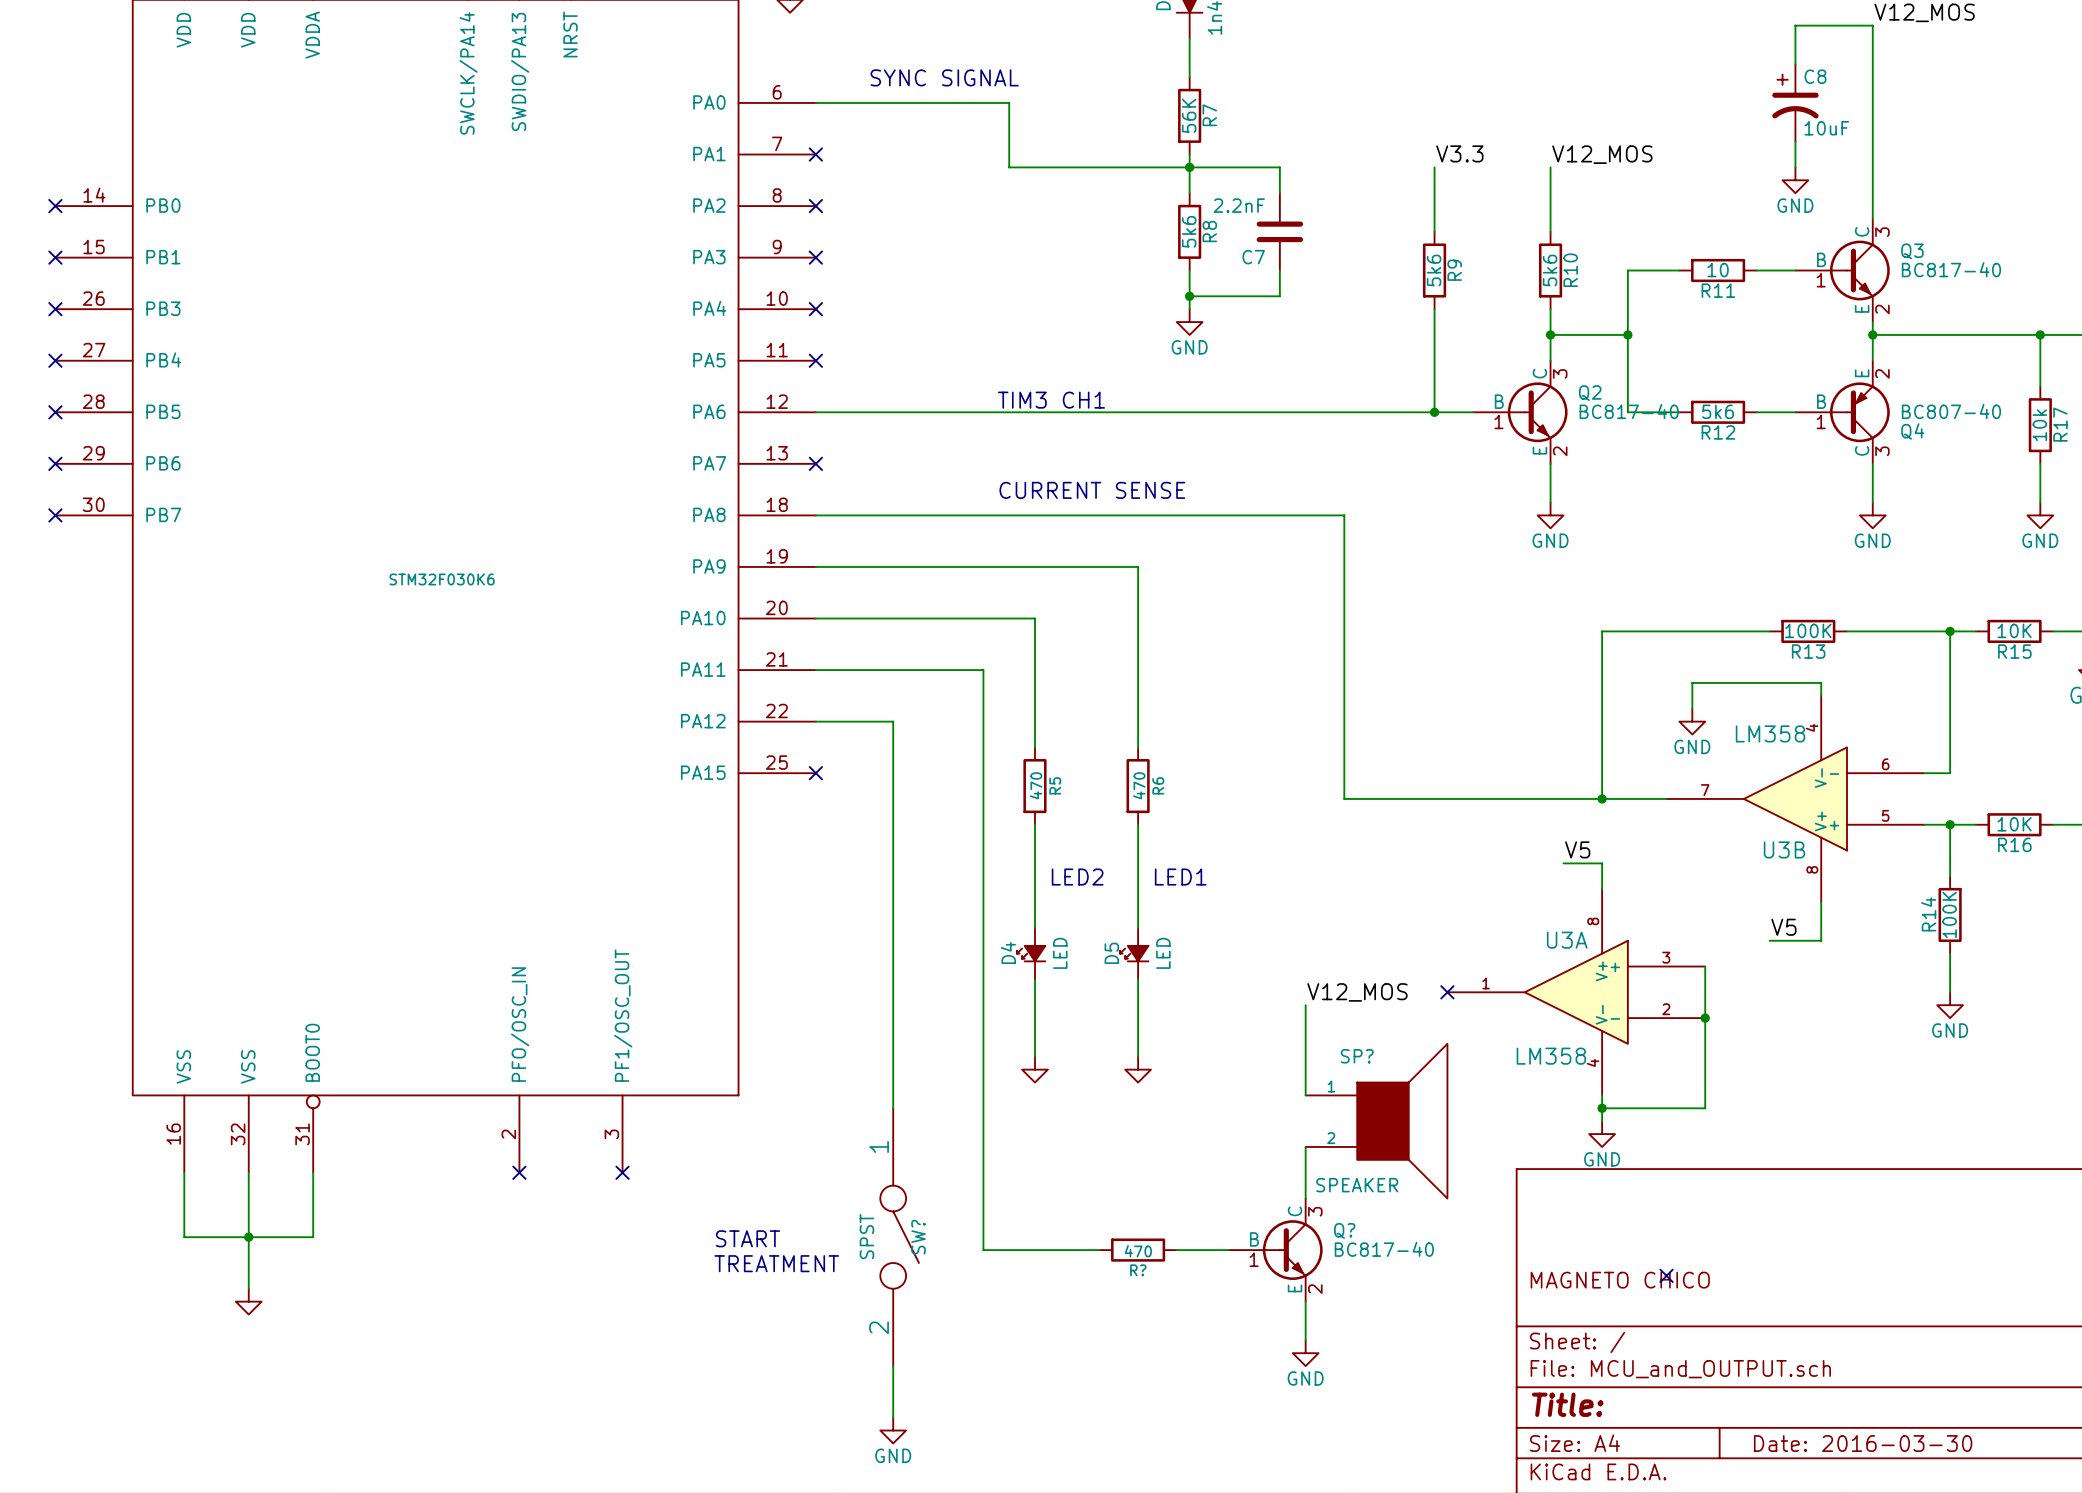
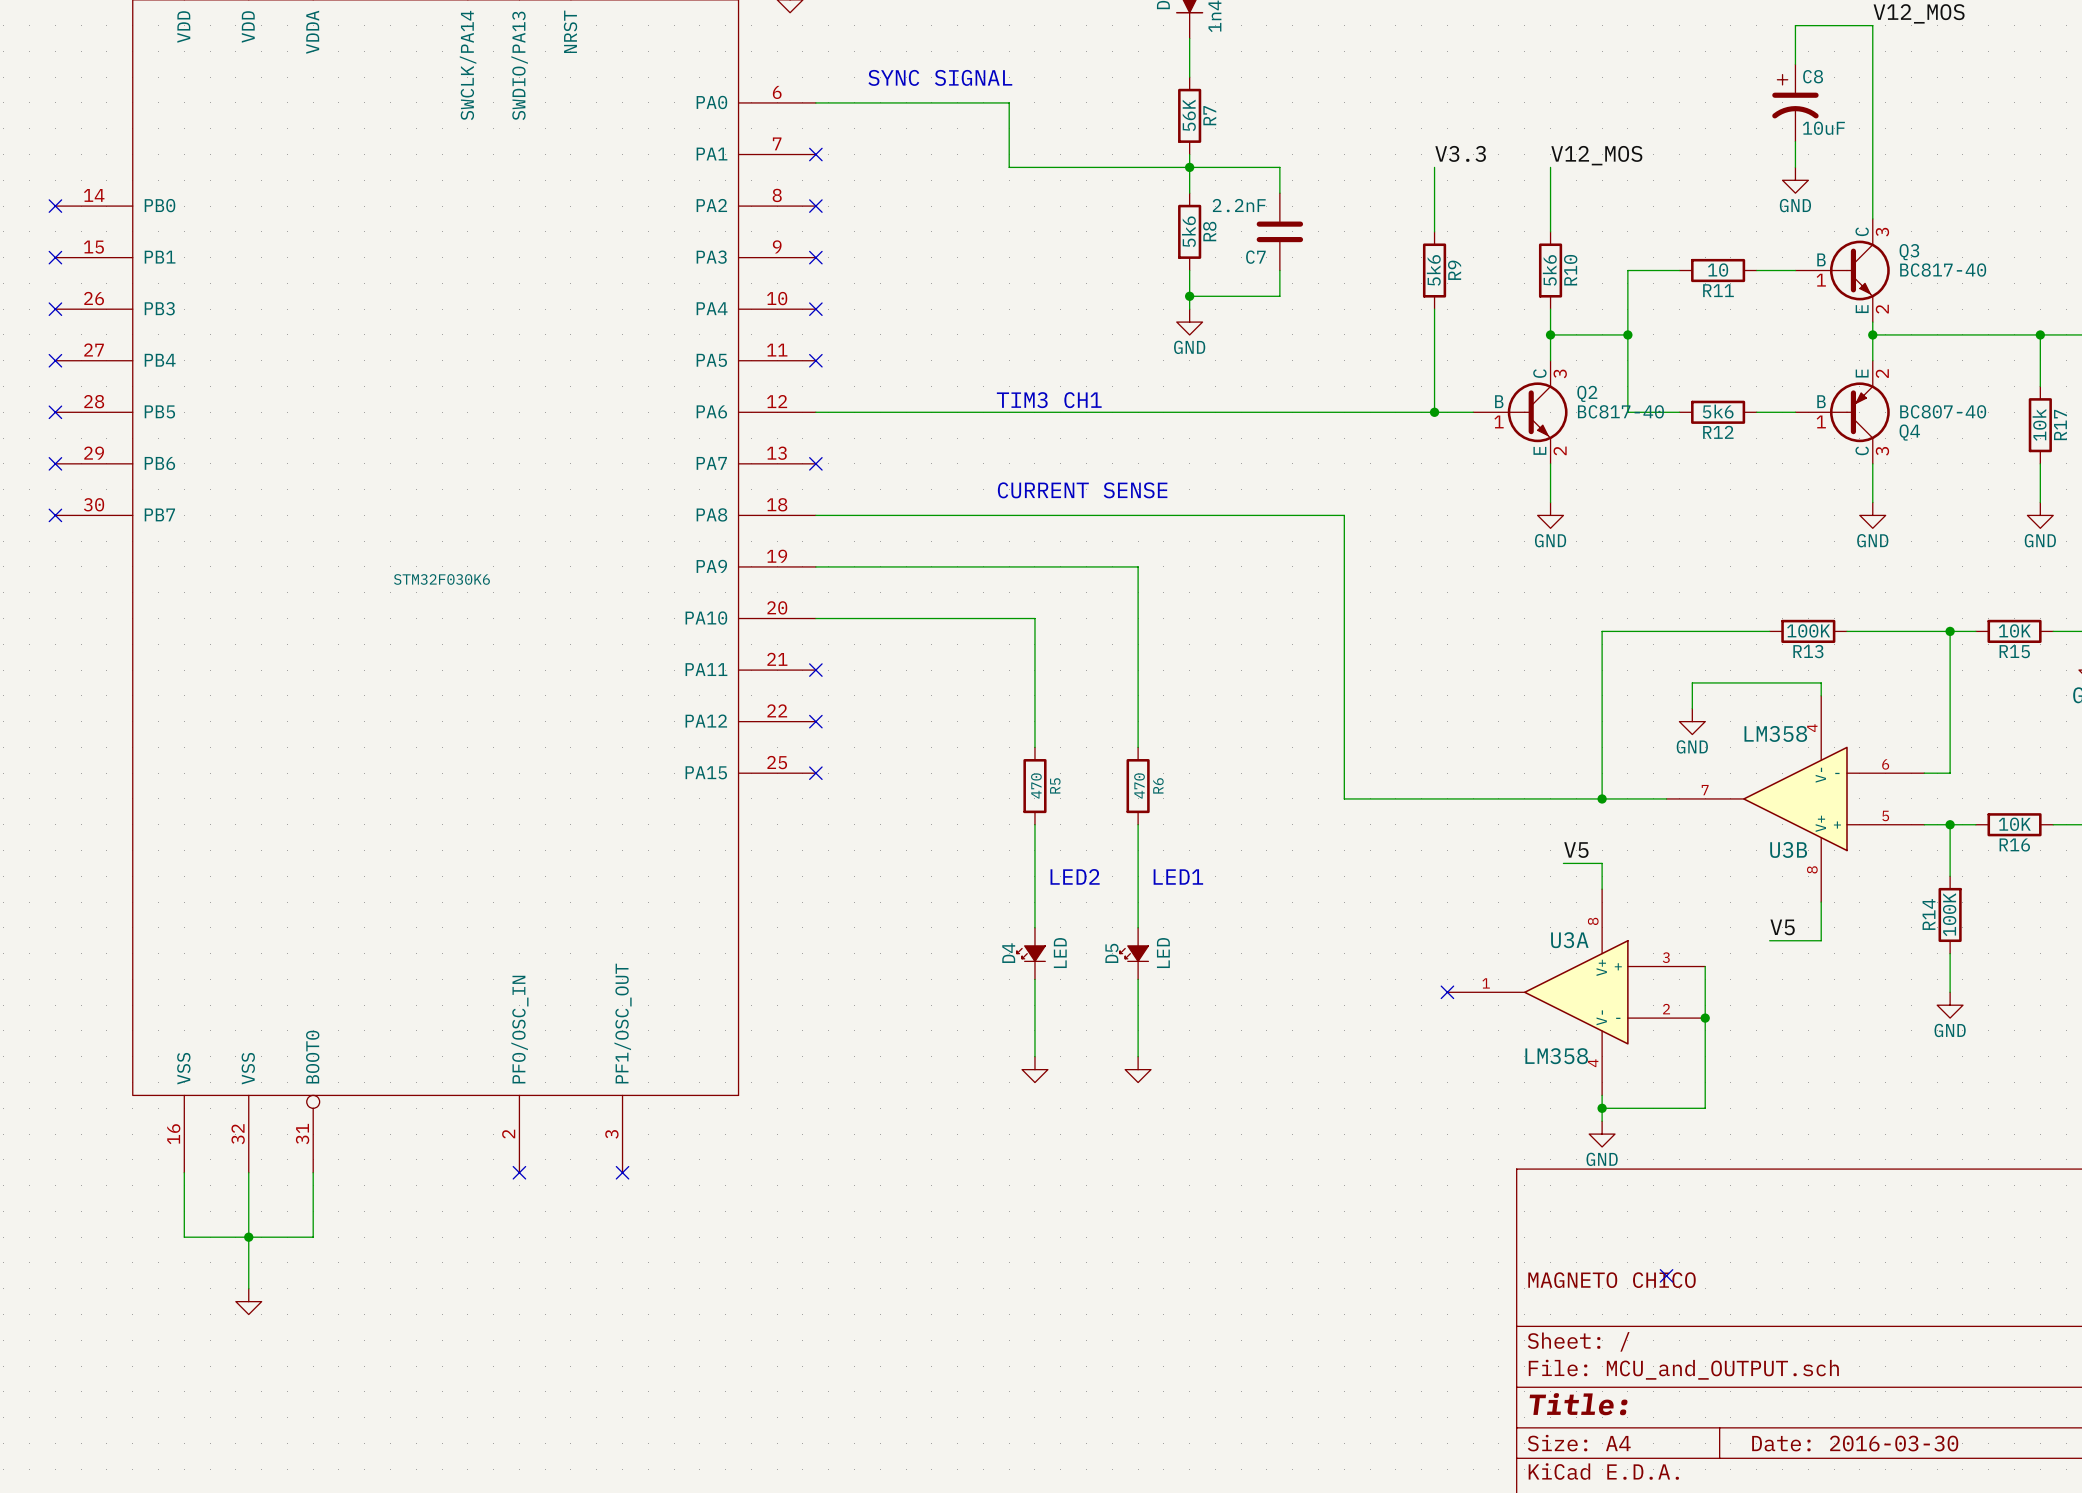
wire: (815, 670) (983, 670) (983, 1250) (1099, 1250) -> none
no-connect mark: none -> (815, 670)
wire: (815, 721) (893, 721) (893, 1108) -> none
no-connect mark: none -> (815, 721)
label: V12_MOS (1357, 992) -> none
wire: (1305, 1005) (1305, 1095) -> none
SP?: SPEAKER (1376, 1121) -> none
wire: (1305, 1146) (1305, 1198) -> none
SW?: SPST (899, 1237) -> none
text: START (748, 1238) -> none
R?: 470 (1138, 1250) -> none
wire: (1176, 1250) (1228, 1250) -> none
Q?: BC817-40 (1275, 1250) -> none
text: TREATMENT (776, 1263) -> none
wire: (1305, 1301) (1305, 1340) -> none
power symbol: GND (1305, 1353) -> none
wire: (893, 1366) (893, 1417) -> none
power symbol: GND (893, 1430) -> none

